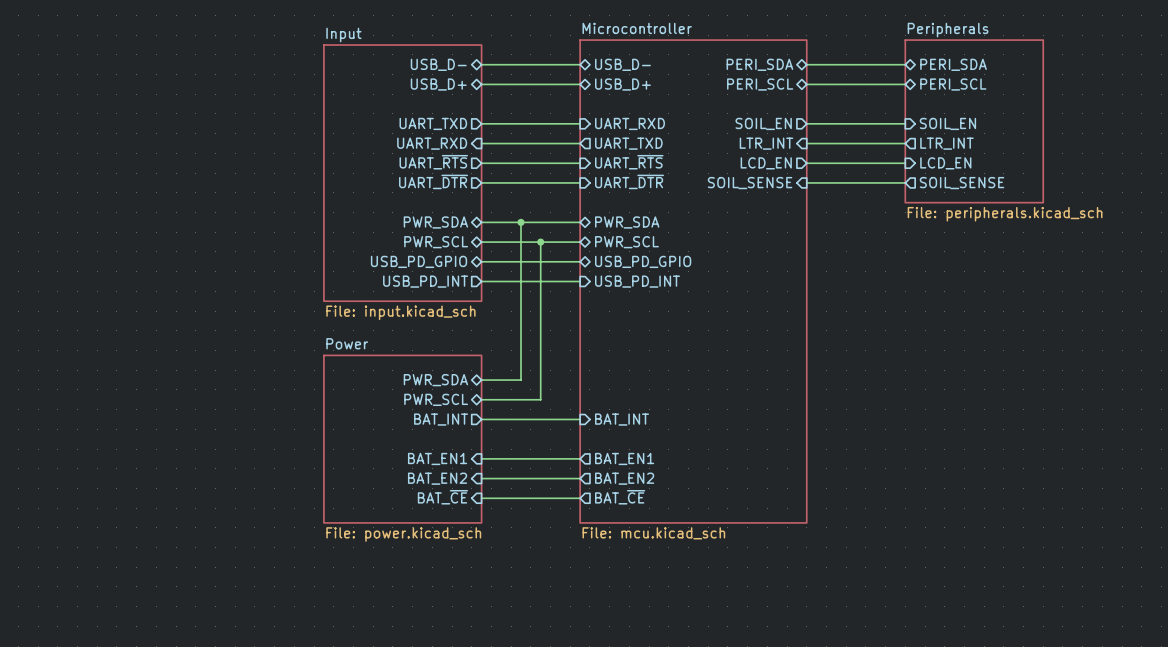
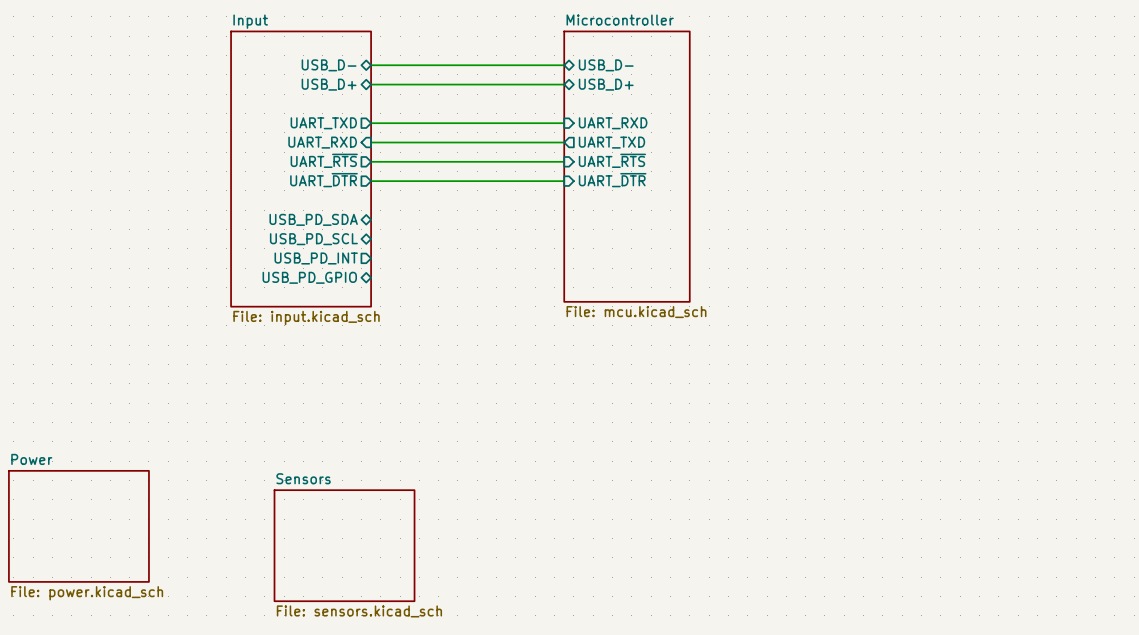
wire: none -> (371, 65) (467, 65)
sheet pin position: USB_D- (438, 64) -> USB_D- (329, 65)
sheet pin: PERI_SDA (759, 64) -> none
wire: (806, 64) (905, 64) -> none
sheet pin: PERI_SDA (953, 64) -> none
wire: none -> (371, 84) (467, 84)
sheet pin position: USB_D+ (438, 84) -> USB_D+ (329, 84)
sheet pin: PERI_SCL (760, 84) -> none
wire: (806, 84) (905, 84) -> none
sheet pin: PERI_SCL (953, 84) -> none
sheet Peripherals: File: peripherals.kicad_sch (974, 121) -> none
sheet pin position: UART_TXD (433, 123) -> UART_TXD (323, 123)
sheet pin: SOIL_EN (763, 123) -> none
wire: (806, 123) (905, 123) -> none
sheet pin: SOIL_EN (947, 123) -> none
sheet pin position: UART_RXD (432, 143) -> UART_RXD (322, 142)
sheet pin: LTR_INT (766, 143) -> none
wire: (806, 143) (905, 143) -> none
sheet pin: LTR_INT (946, 143) -> none
sheet pin position: UART_~{RTS} (433, 162) -> UART_~{RTS} (324, 160)
sheet pin: LCD_EN (766, 163) -> none
wire: (806, 163) (905, 163) -> none
sheet pin: LCD_EN (945, 163) -> none
sheet Microcontroller: none -> File: mcu.kicad_sch (626, 166)
sheet Input: none -> File: input.kicad_sch (301, 169)
sheet Input: File: input.kicad_sch (402, 173) -> none
sheet pin position: UART_~{DTR} (433, 181) -> UART_~{DTR} (323, 180)
wire: (806, 182) (905, 182) -> none
sheet pin: SOIL_SENSE (750, 183) -> none
sheet pin: SOIL_SENSE (962, 183) -> none
sheet pin: none -> USB_PD_SDA (313, 219)
sheet pin: PWR_SDA (435, 222) -> none
wire: (481, 222) (580, 222) -> (371, 123) (467, 123)
wire: (520, 222) (520, 380) (481, 380) -> none
junction: (520, 222) -> none
sheet pin: PWR_SDA (627, 222) -> none
sheet pin: none -> USB_PD_SCL (313, 239)
sheet pin: PWR_SCL (436, 242) -> none
wire: (481, 242) (580, 242) -> (371, 142) (467, 142)
wire: (540, 242) (540, 399) (481, 399) -> none
junction: (540, 242) -> none
sheet pin: PWR_SCL (626, 242) -> none
sheet pin position: USB_PD_GPIO (419, 261) -> USB_PD_GPIO (309, 277)
wire: (481, 261) (580, 261) -> (371, 161) (467, 161)
sheet pin: USB_PD_GPIO (643, 261) -> none
sheet pin position: USB_PD_INT (425, 281) -> USB_PD_INT (316, 258)
wire: (481, 281) (580, 281) -> (371, 181) (467, 181)
sheet pin: USB_PD_INT (637, 281) -> none
sheet Microcontroller: File: mcu.kicad_sch (693, 281) -> none
sheet pin: PWR_SDA (435, 380) -> none
sheet pin: PWR_SCL (436, 399) -> none
sheet pin: BAT_INT (441, 419) -> none
wire: (481, 419) (580, 419) -> none
sheet pin: BAT_INT (622, 419) -> none
sheet Power: File: power.kicad_sch (402, 439) -> none
sheet pin: BAT_EN1 (437, 458) -> none
wire: (481, 458) (580, 458) -> none
sheet pin: BAT_EN1 (624, 458) -> none
sheet pin: BAT_EN2 (437, 478) -> none
wire: (481, 478) (580, 478) -> none
sheet pin: BAT_EN2 (624, 478) -> none
sheet pin: BAT_~{CE} (442, 497) -> none
sheet pin: BAT_~{CE} (620, 497) -> none
wire: (481, 498) (580, 498) -> none
sheet Power: none -> File: power.kicad_sch (78, 526)
sheet Sensors: none -> File: sensors.kicad_sch (344, 545)

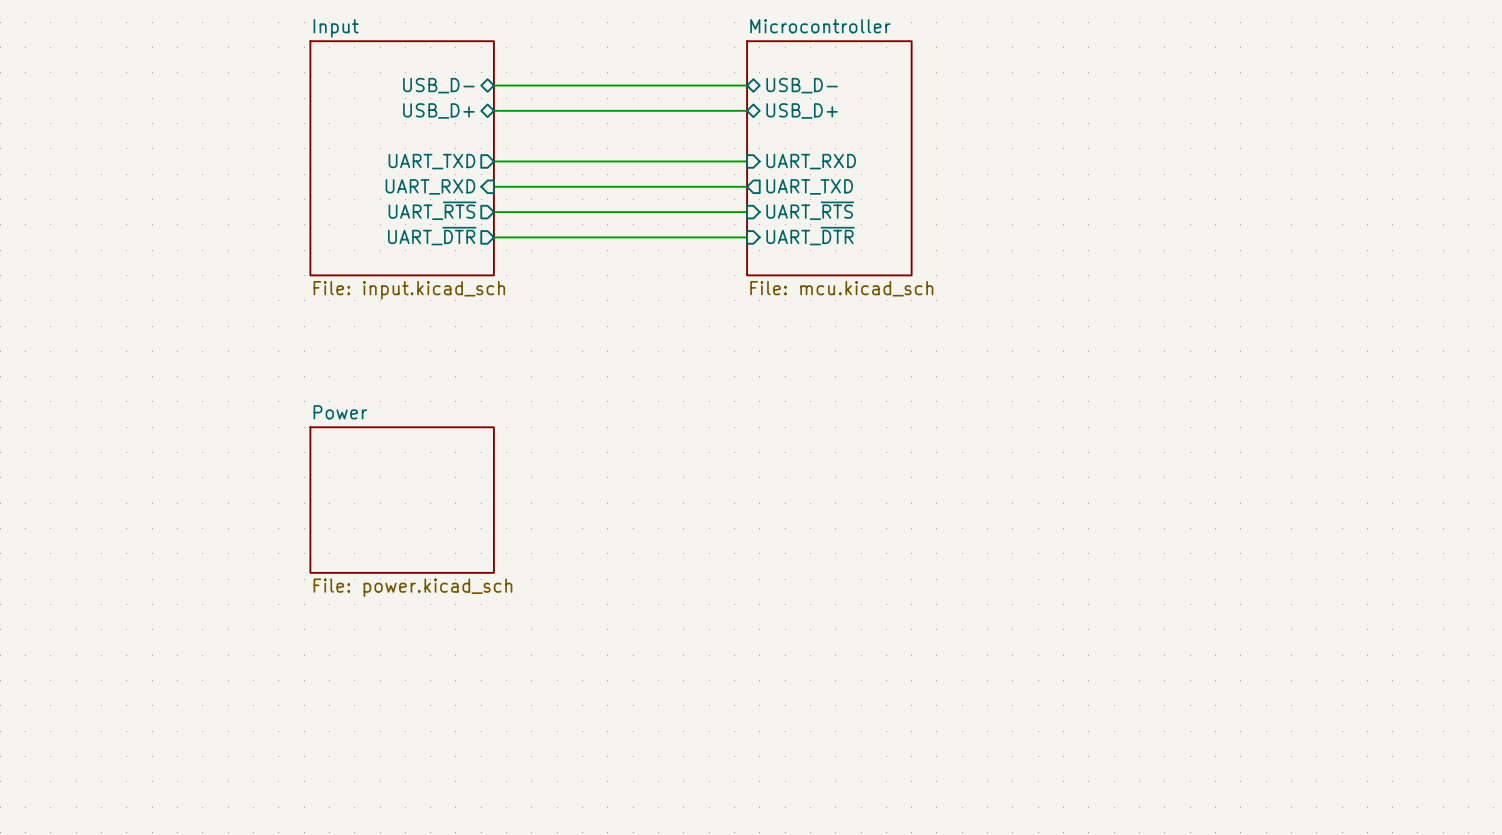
sheet Input: none -> File: input.kicad_sch (402, 158)
sheet Microcontroller: none -> File: mcu.kicad_sch (829, 158)
sheet Microcontroller: File: mcu.kicad_sch (626, 166) -> none
sheet Input: File: input.kicad_sch (301, 169) -> none
sheet pin: USB_PD_SDA (313, 219) -> none
sheet pin: USB_PD_SCL (313, 239) -> none
sheet pin: USB_PD_INT (316, 258) -> none
sheet pin: USB_PD_GPIO (309, 277) -> none
sheet Power: none -> File: power.kicad_sch (402, 500)
sheet Power: File: power.kicad_sch (78, 526) -> none
sheet Sensors: File: sensors.kicad_sch (344, 545) -> none

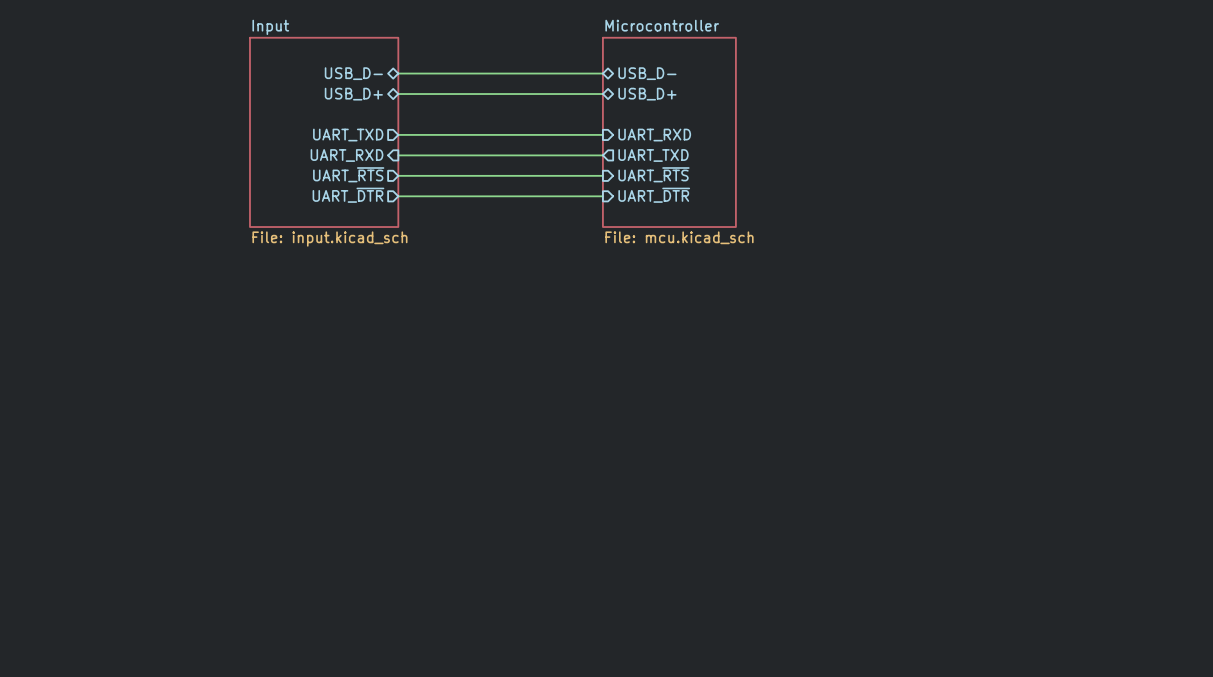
sheet Power: File: power.kicad_sch (402, 500) -> none

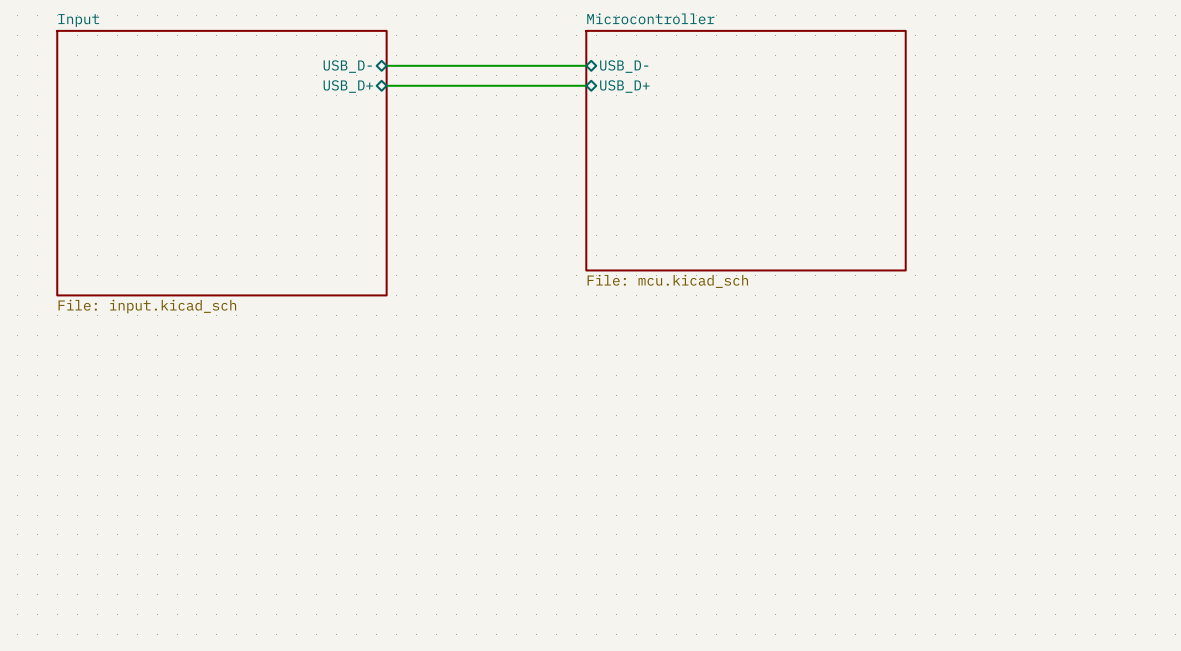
sheet Input: File: input.kicad_sch (324, 132) -> none
sheet Microcontroller: File: mcu.kicad_sch (669, 132) -> none
wire: (398, 134) (602, 134) -> none
sheet pin: UART_TXD (348, 135) -> none
sheet pin: UART_RXD (654, 135) -> none
sheet pin: UART_RXD (347, 155) -> none
wire: (398, 155) (602, 155) -> none
sheet pin: UART_TXD (653, 155) -> none
sheet Microcontroller: none -> File: mcu.kicad_sch (746, 150)
sheet Input: none -> File: input.kicad_sch (221, 163)
sheet pin: UART_~{RTS} (348, 174) -> none
sheet pin: UART_~{RTS} (653, 174) -> none
wire: (398, 175) (602, 175) -> none
sheet pin: UART_~{DTR} (348, 195) -> none
sheet pin: UART_~{DTR} (654, 195) -> none
wire: (398, 196) (602, 196) -> none

